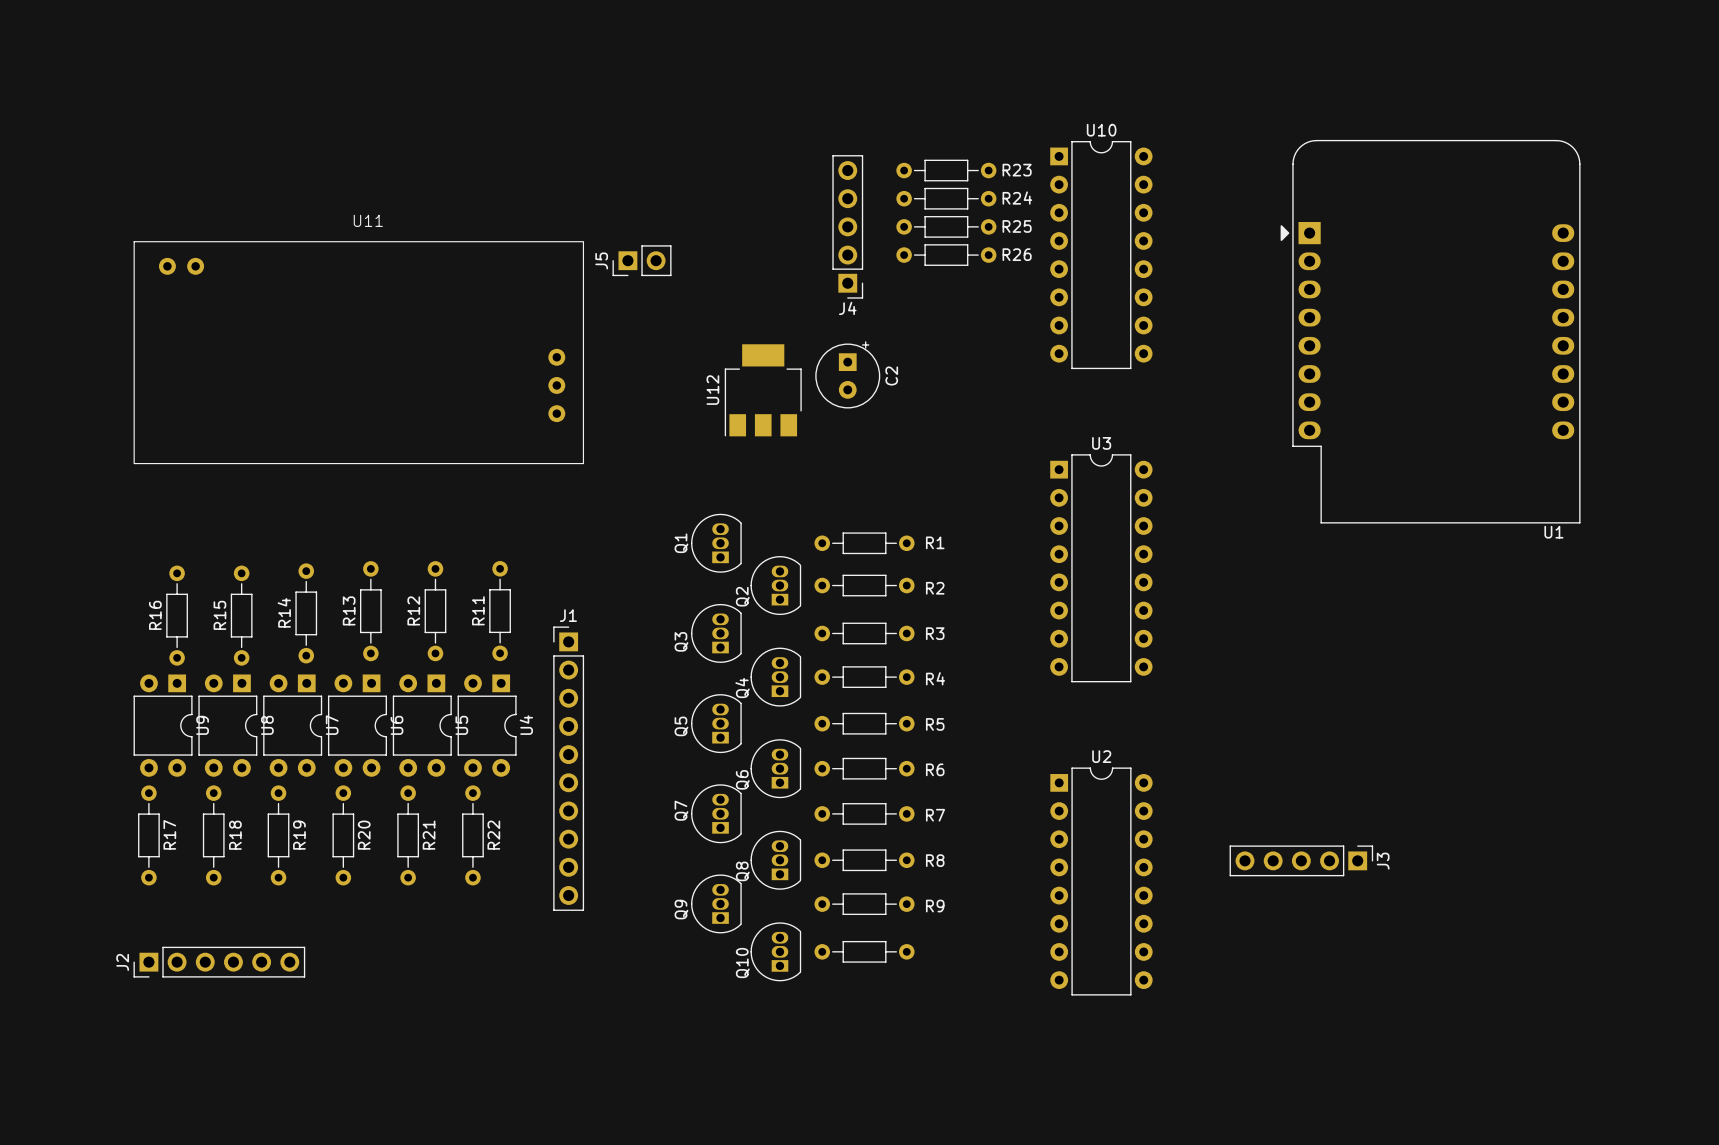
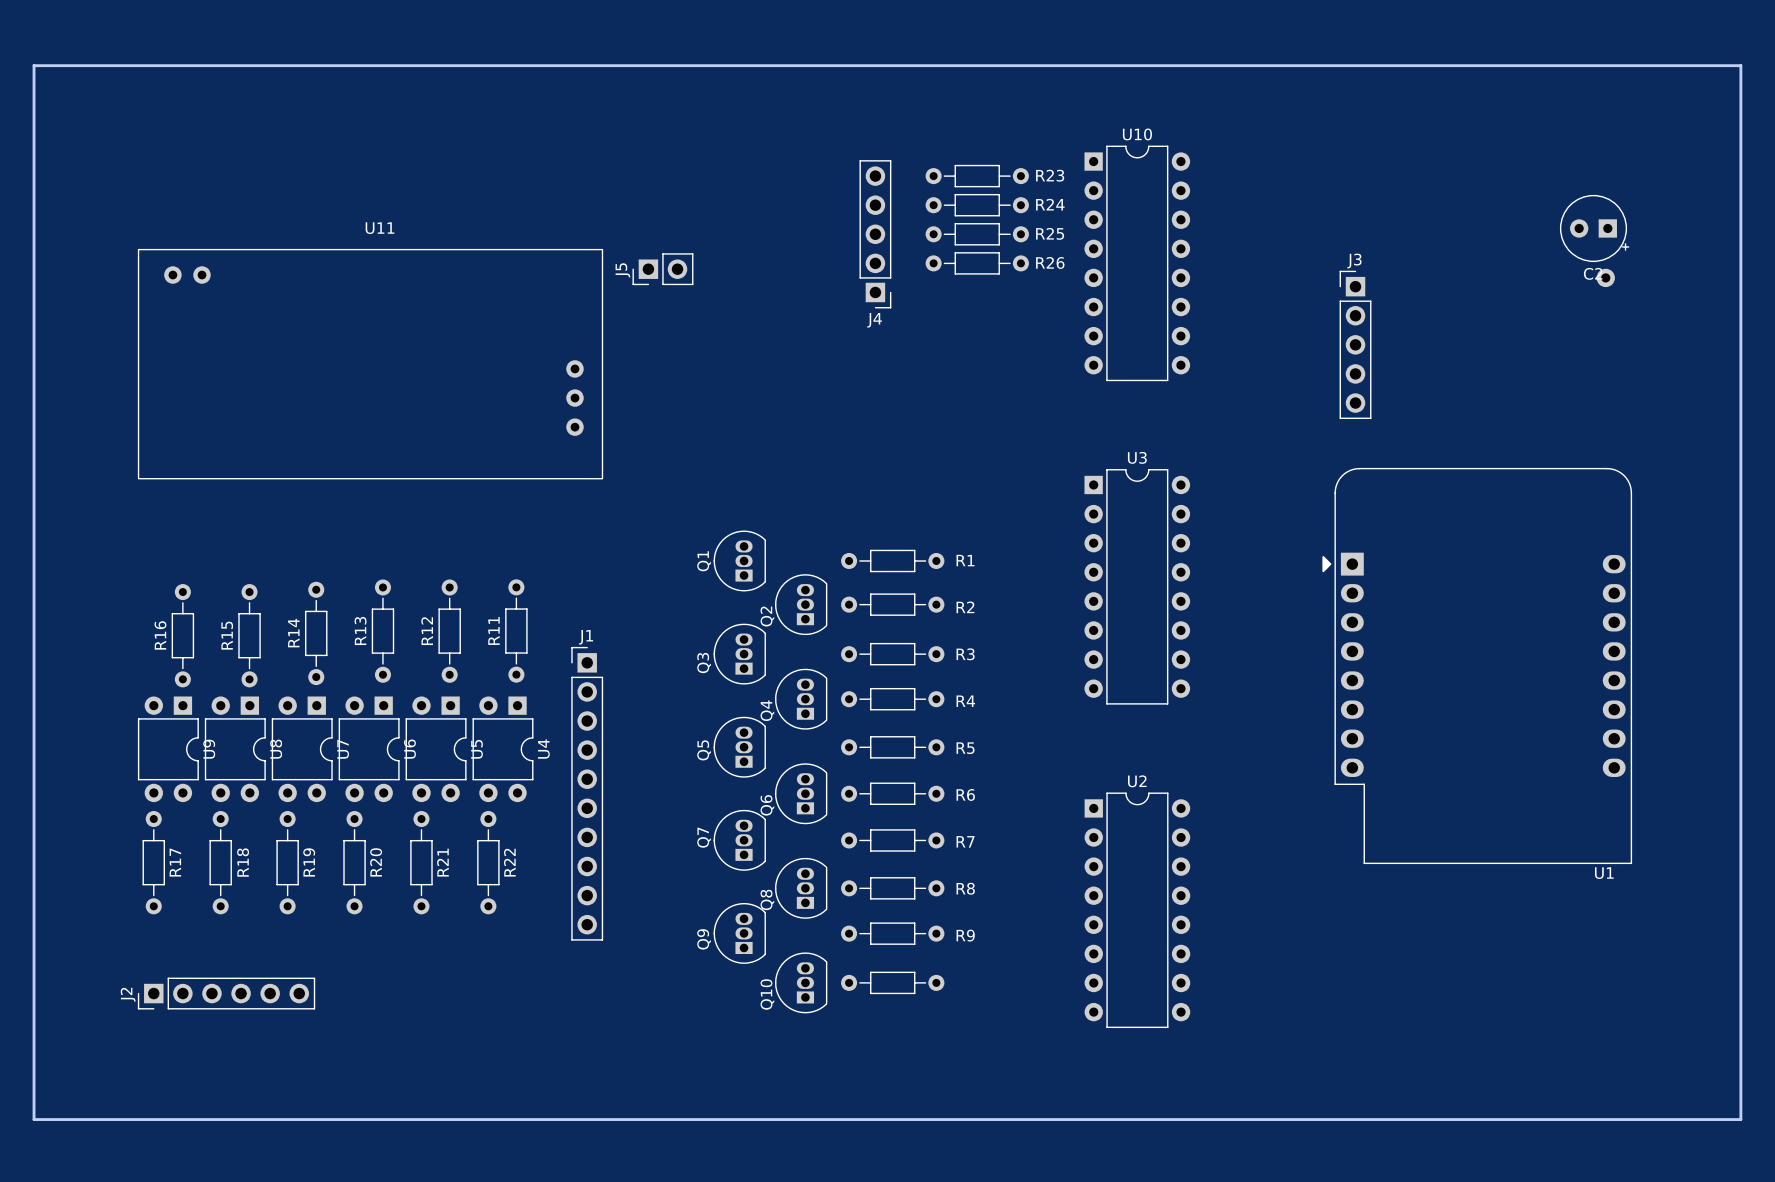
board edge: none -> (34, 65) (1740, 65) (1740, 1119) (34, 1119) (34, 65)
part: none -> (1605, 277)
U1 position: (1430, 331) -> (1477, 665)
C2 rotation: 0° (847, 374) -> 90° clockwise (1594, 228)
C2 position: (847, 374) -> (1594, 228)
U12: (763, 390) -> none
J3 rotation: 0° (1301, 860) -> 90° counterclockwise (1355, 344)
J3 position: (1301, 860) -> (1355, 344)

